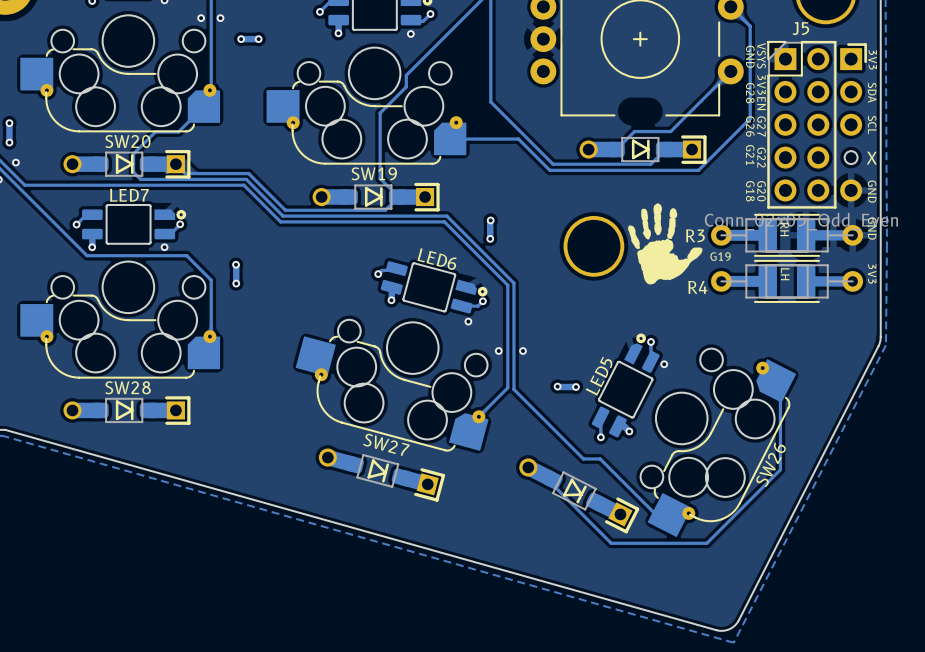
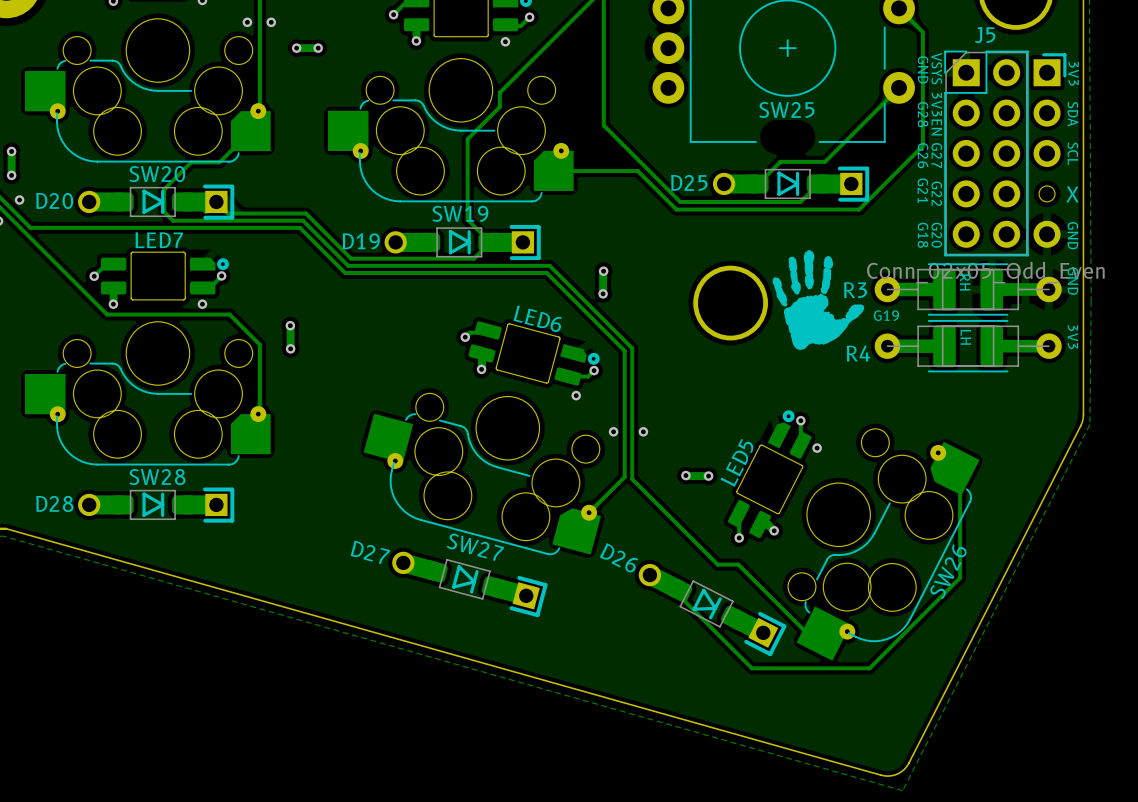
SW25 name: none -> SW25 (786, 109)
D25 name: none -> D25 (689, 182)
D20 name: none -> D20 (54, 200)
D19 name: none -> D19 (361, 241)
D28 name: none -> D28 (54, 503)
D27 name: none -> D27 (370, 552)
D26 name: none -> D26 (619, 557)

